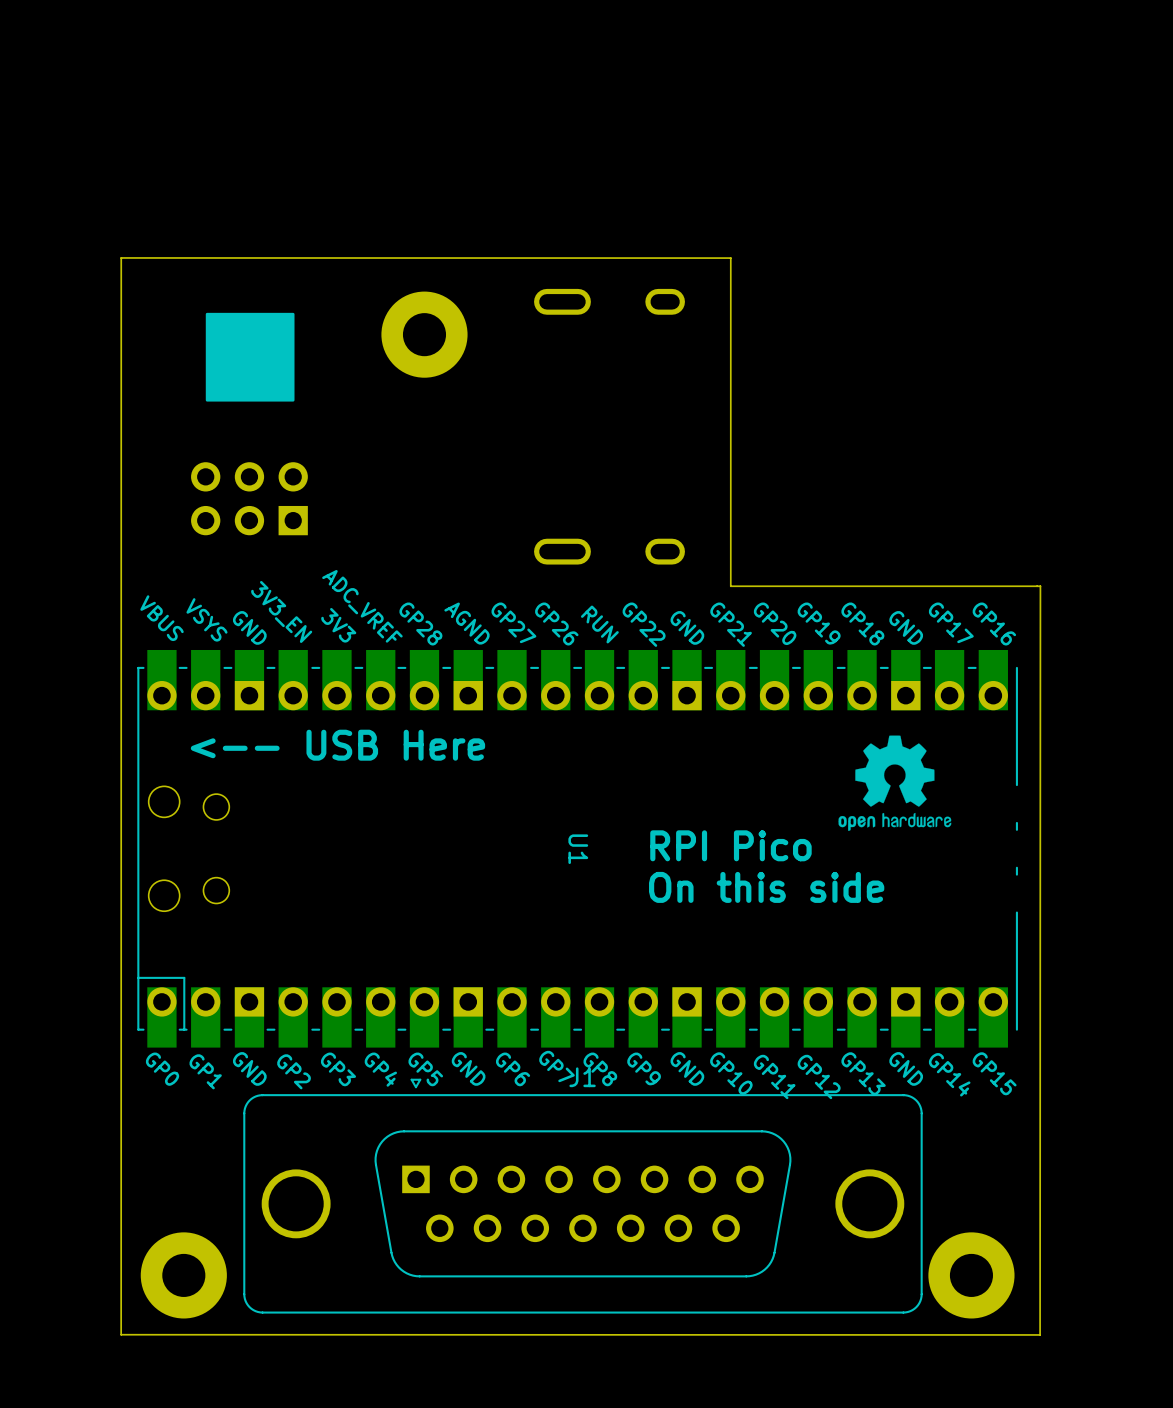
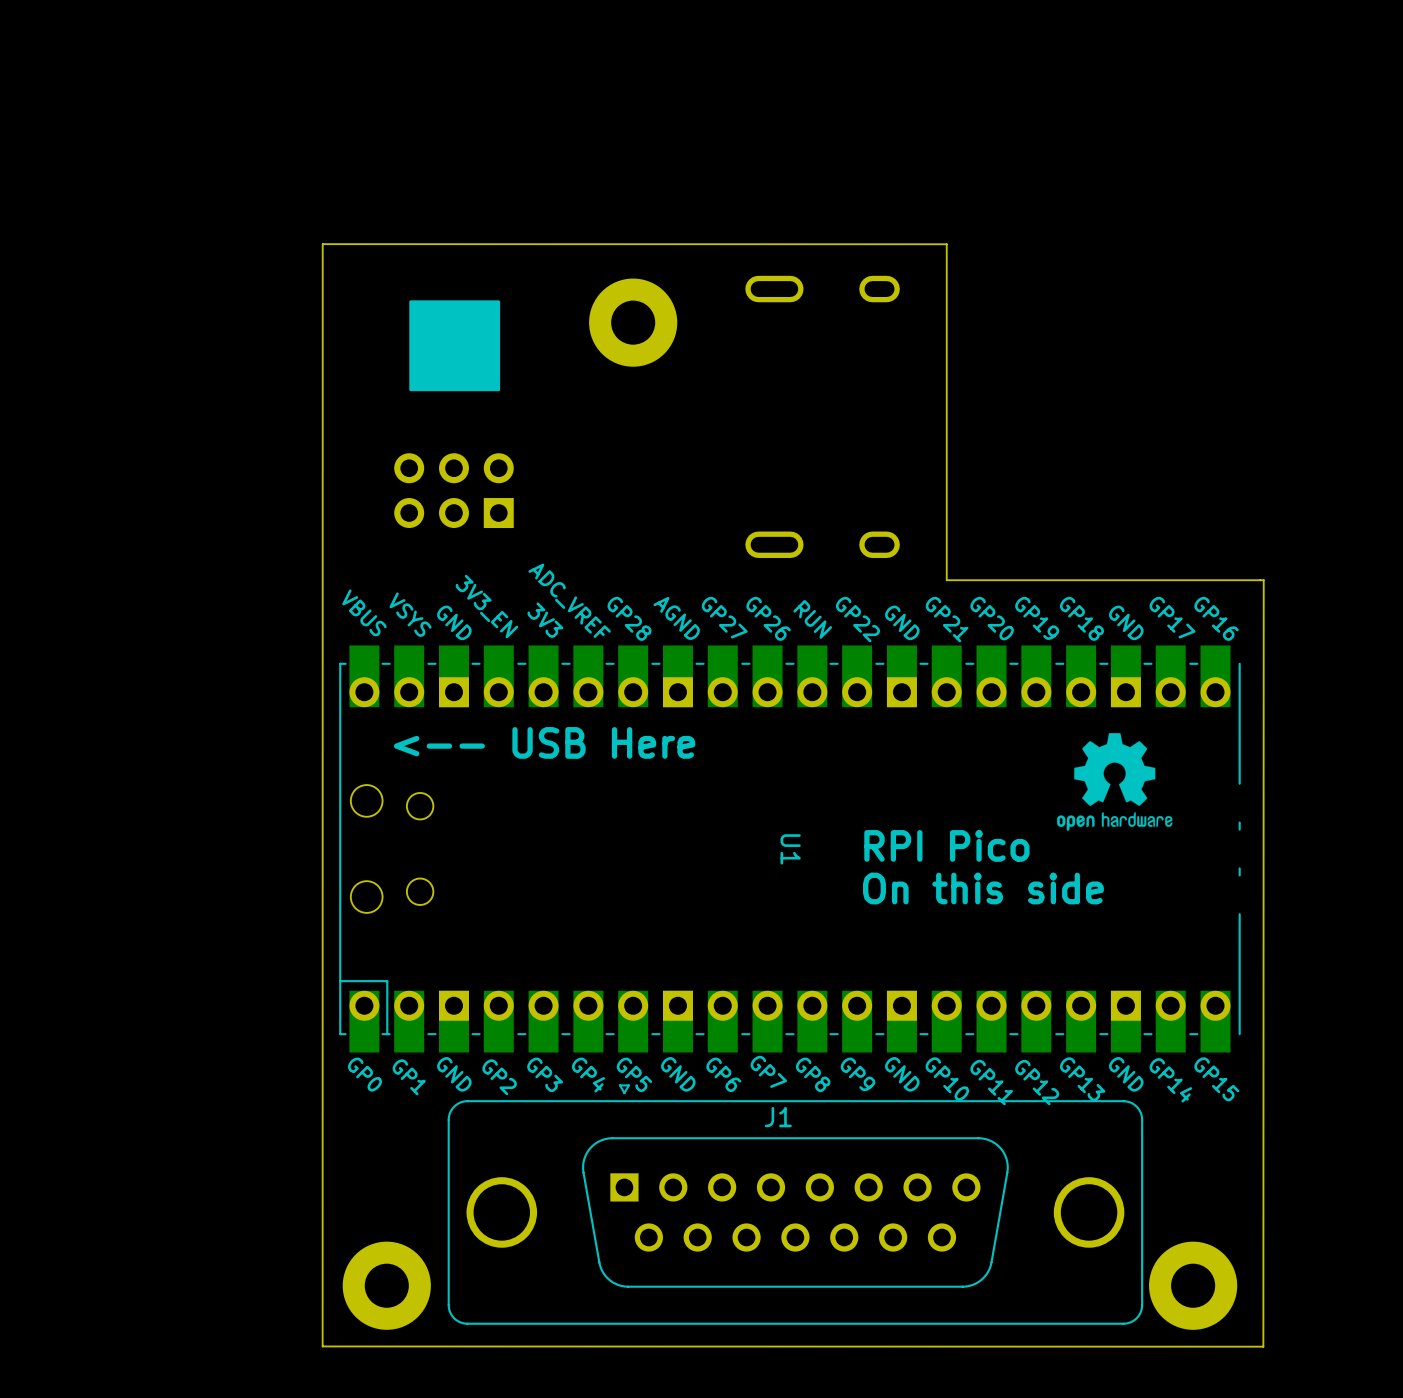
J1 name position: J1 (582, 1077) -> J1 (778, 1117)

